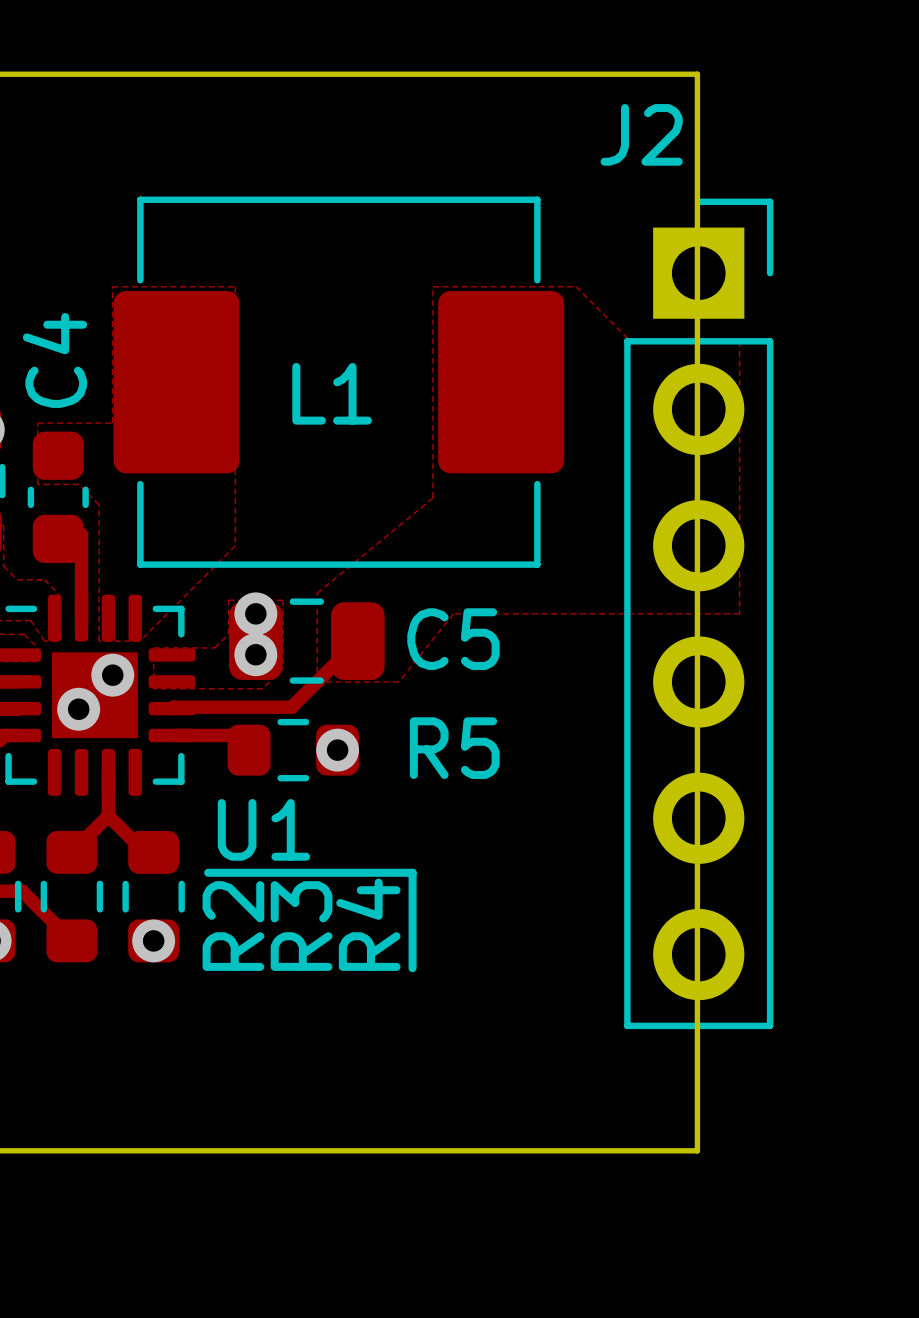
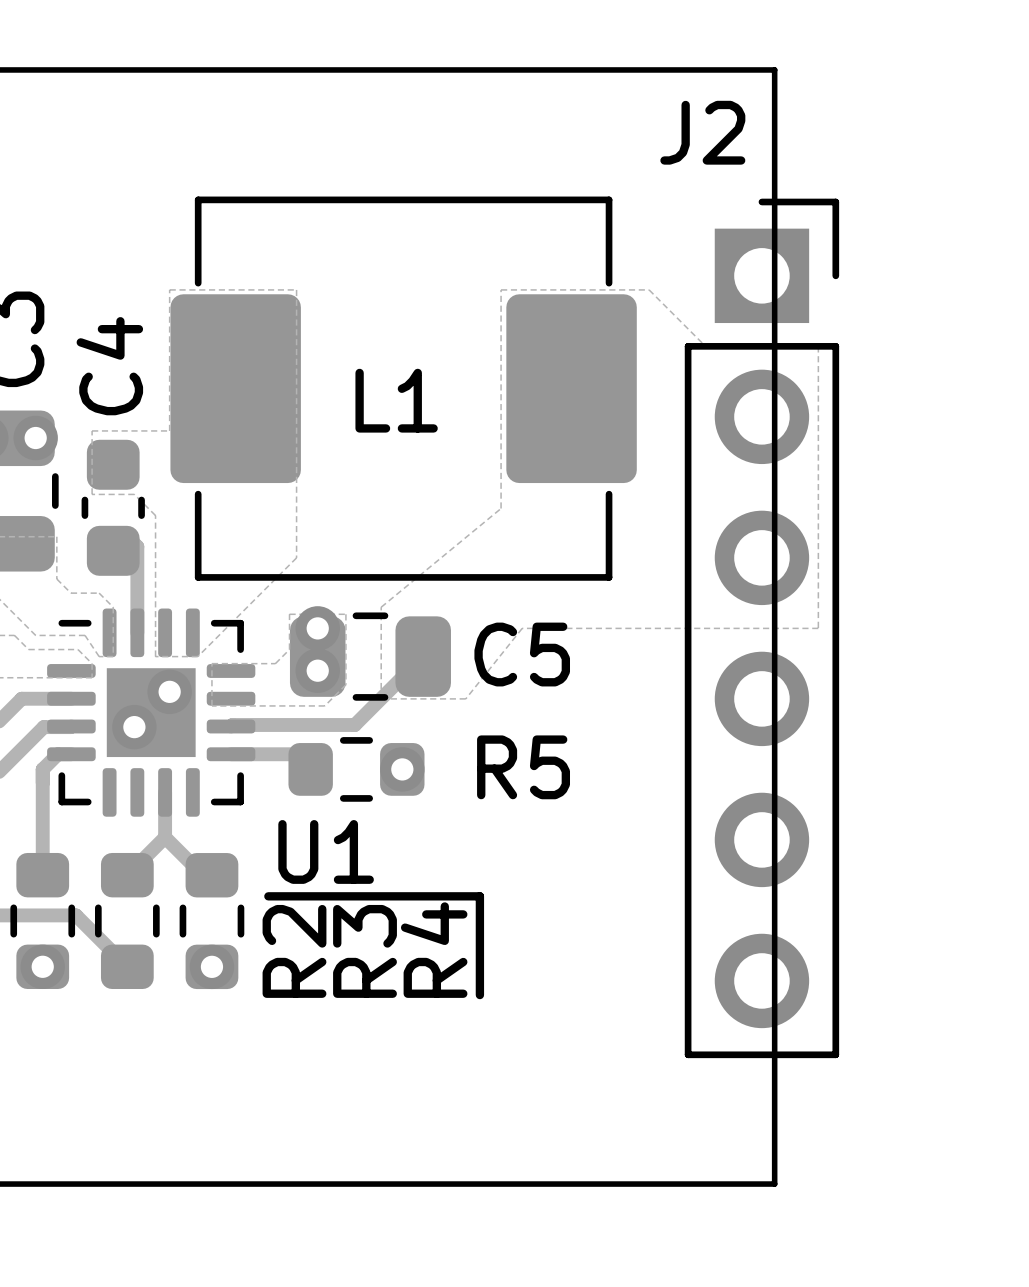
J2 position: (698, 613) -> (761, 628)

